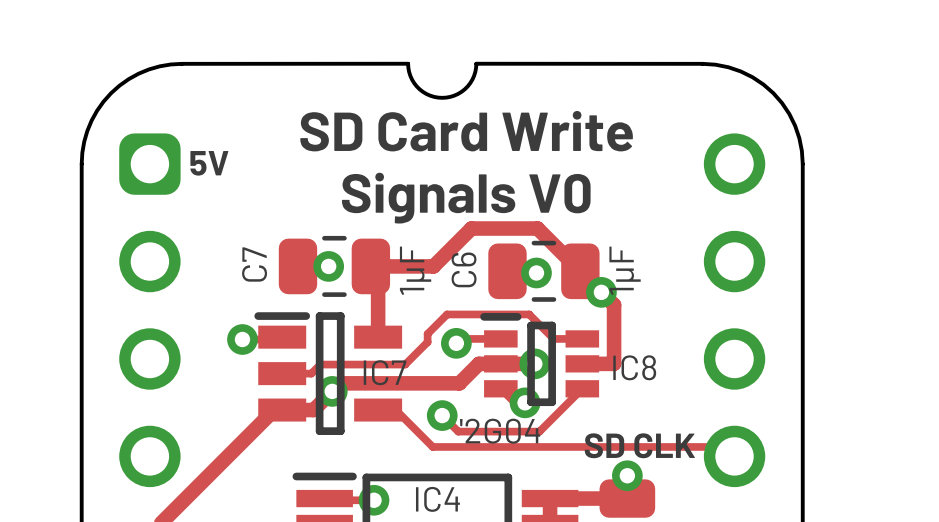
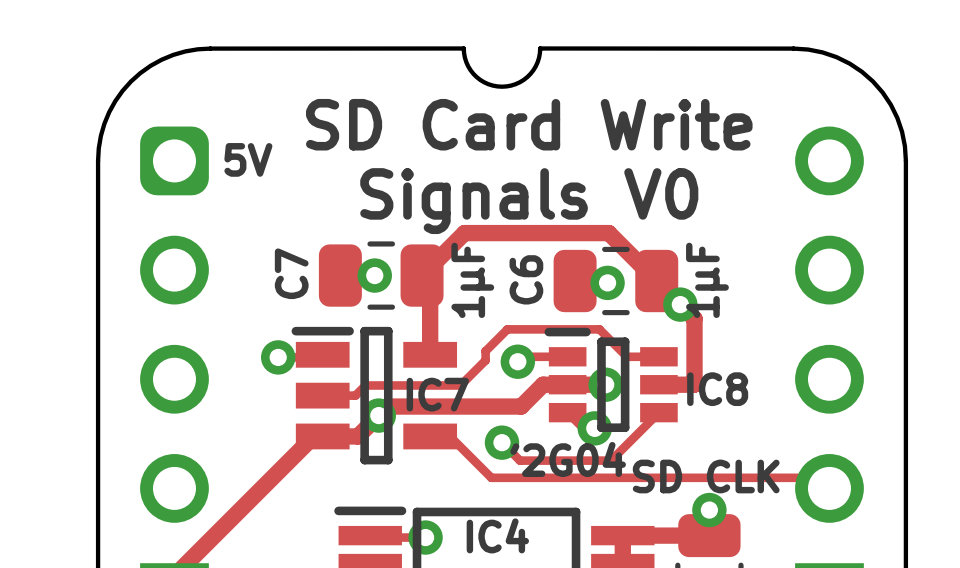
track: (471, 228) (433, 266) (370, 266) -> (534, 233) (464, 233) (422, 275)

